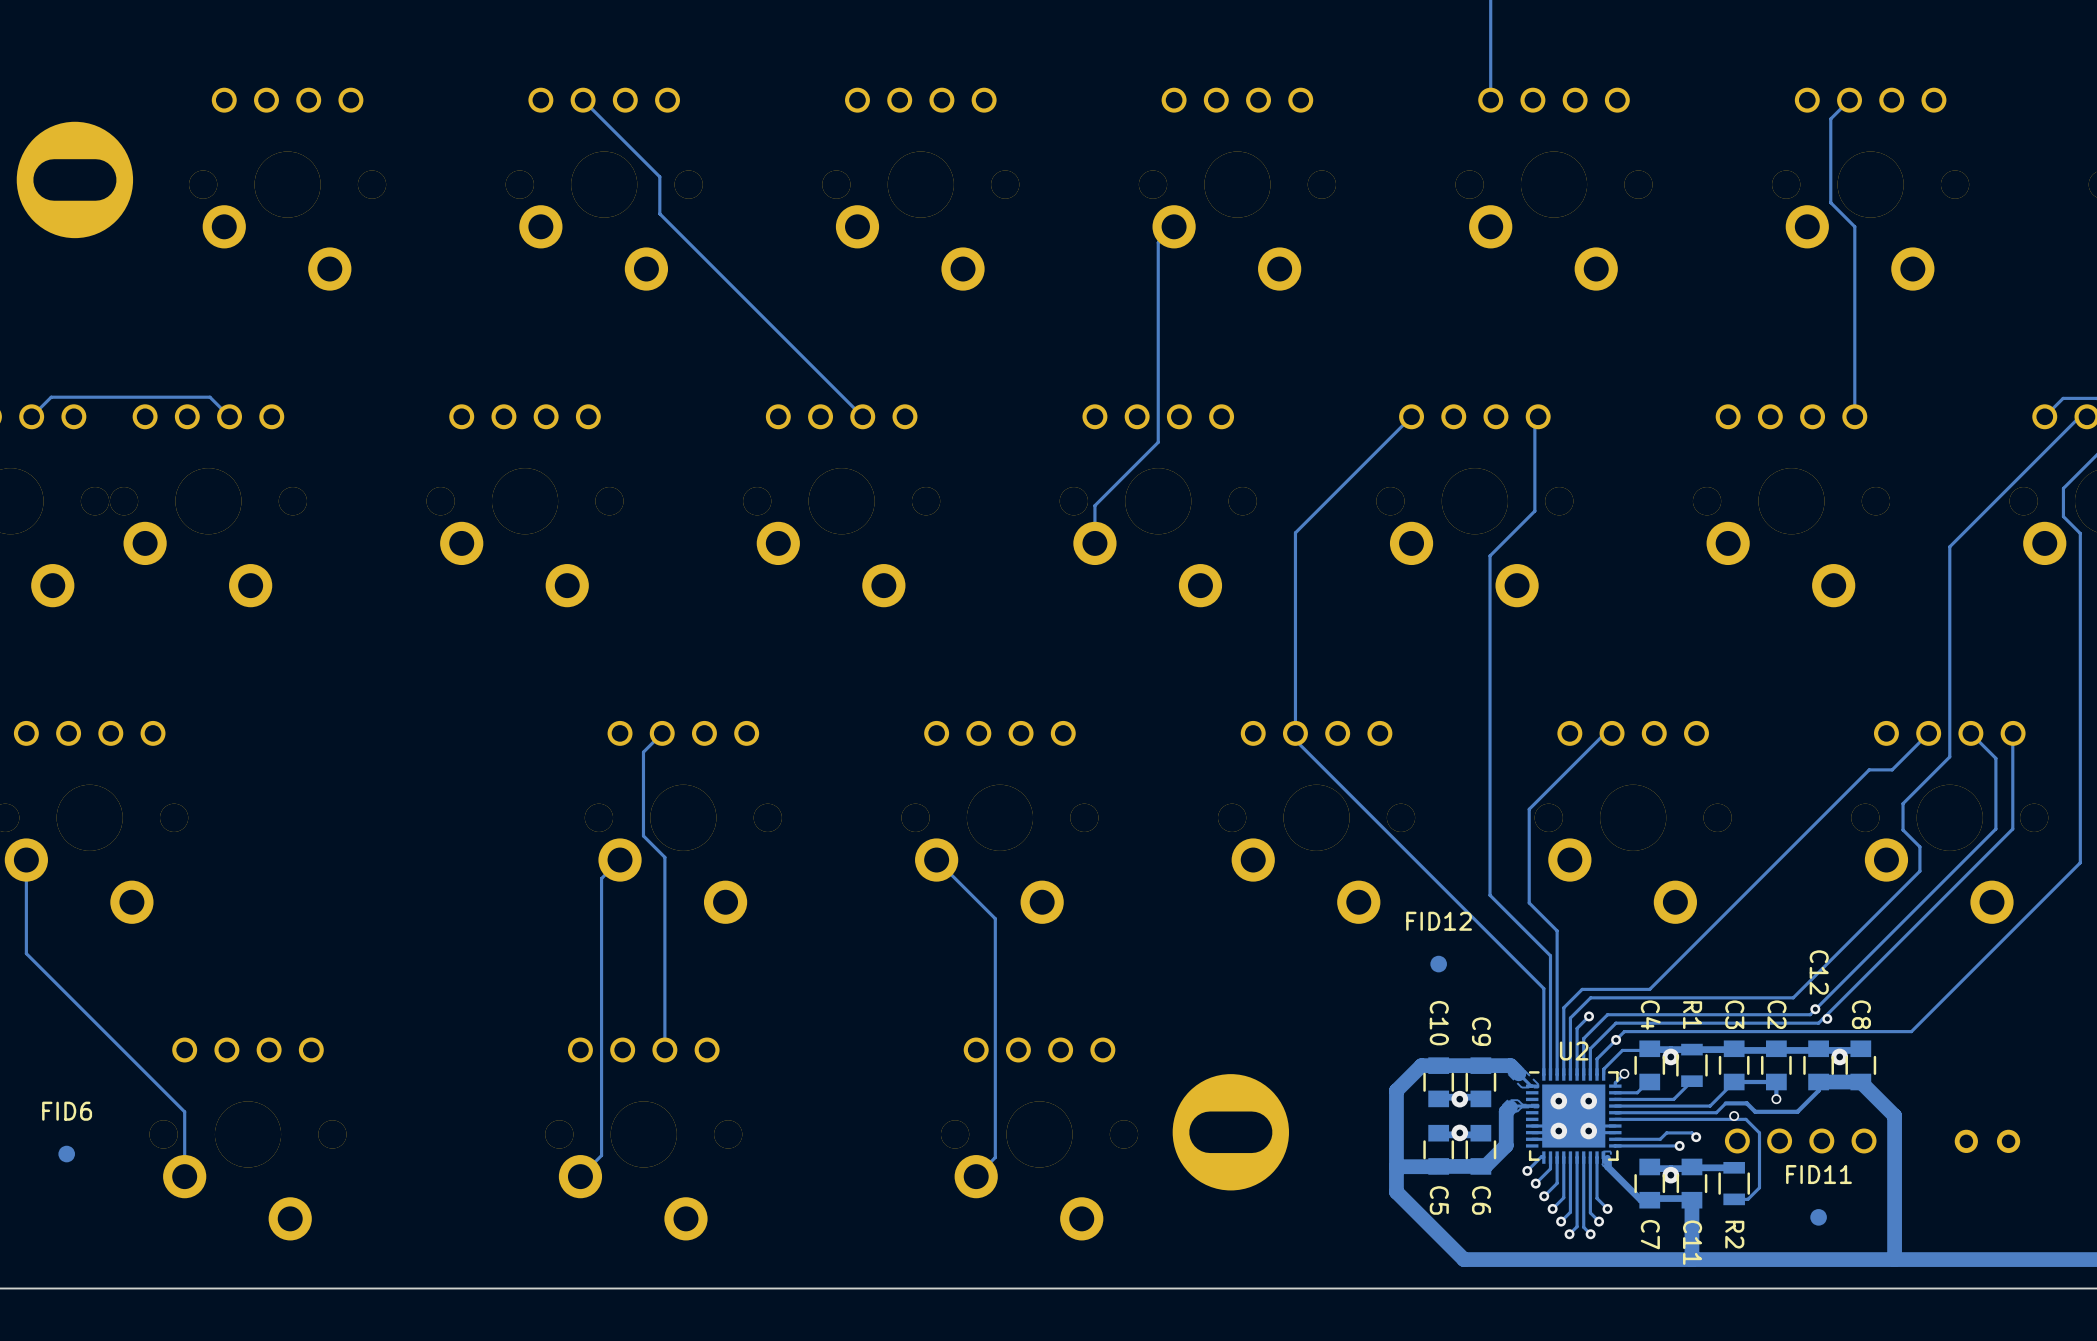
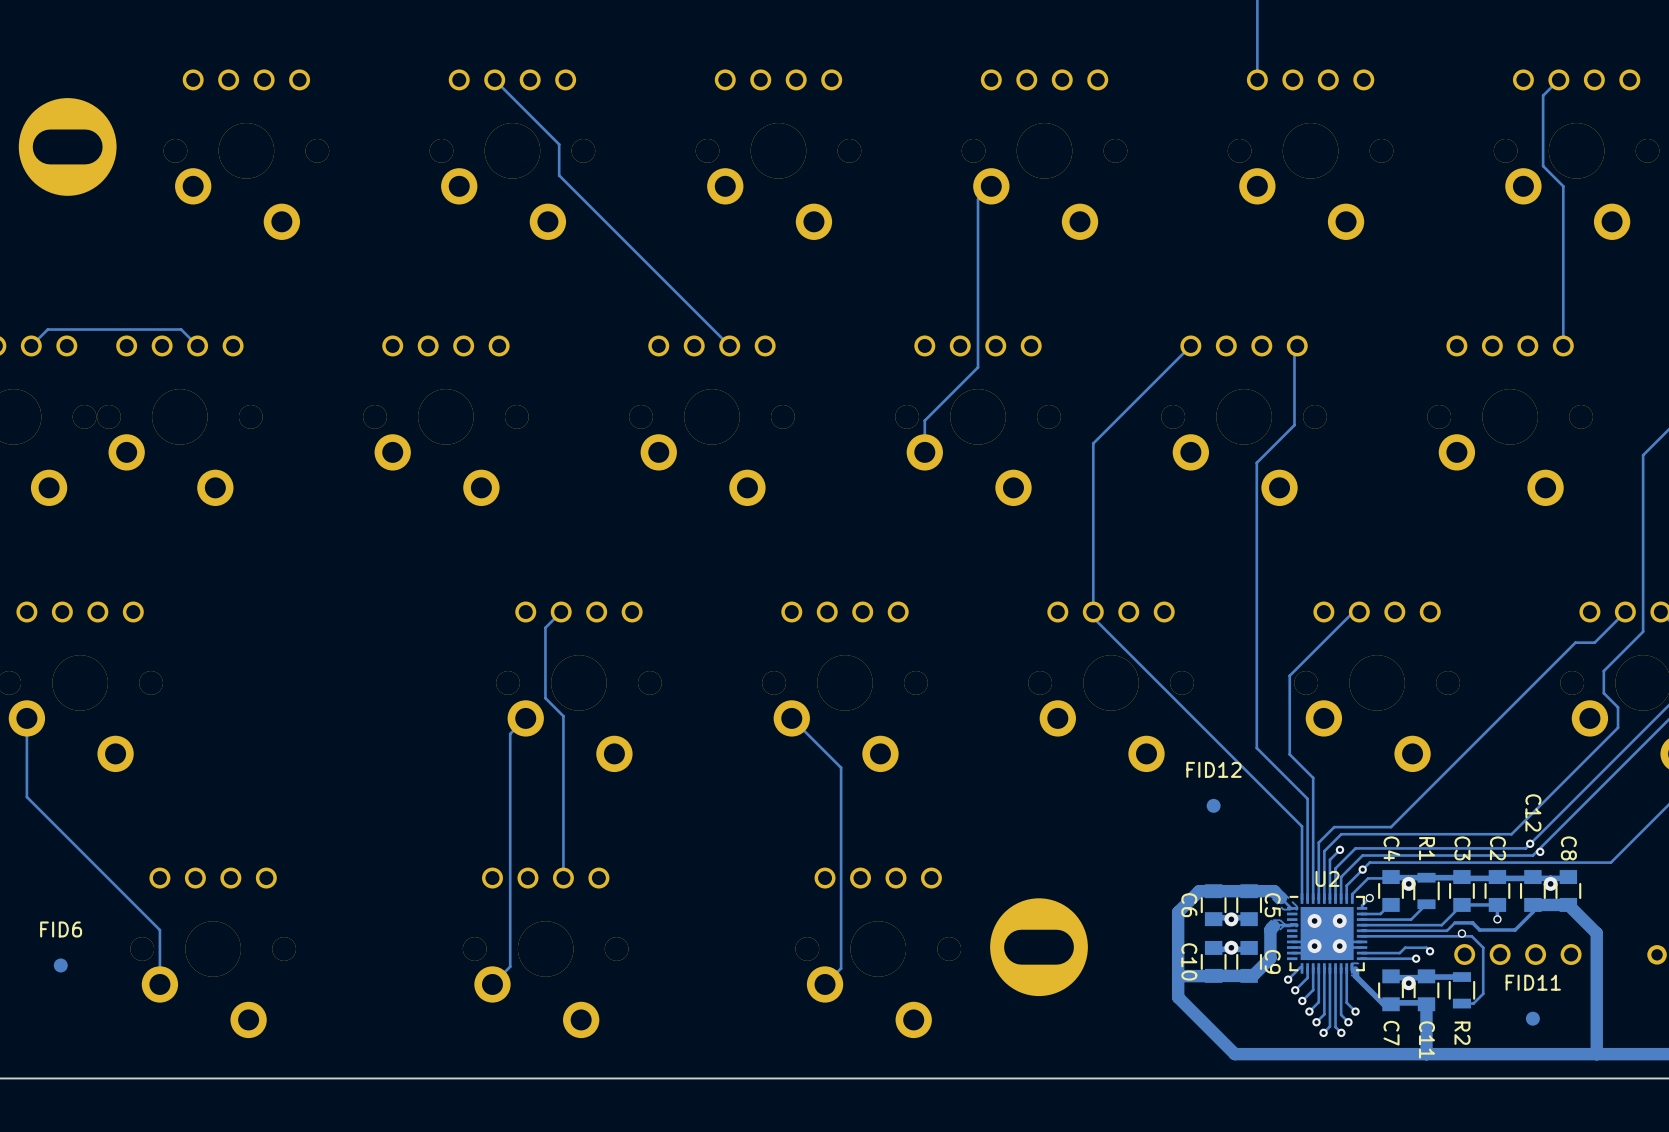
C10 name: C10 (1439, 1023) -> C6 (1189, 905)
C9 name: C9 (1481, 1031) -> C5 (1272, 905)
C5 name: C5 (1439, 1200) -> C10 (1189, 961)
C6 name: C6 (1481, 1200) -> C9 (1272, 961)

